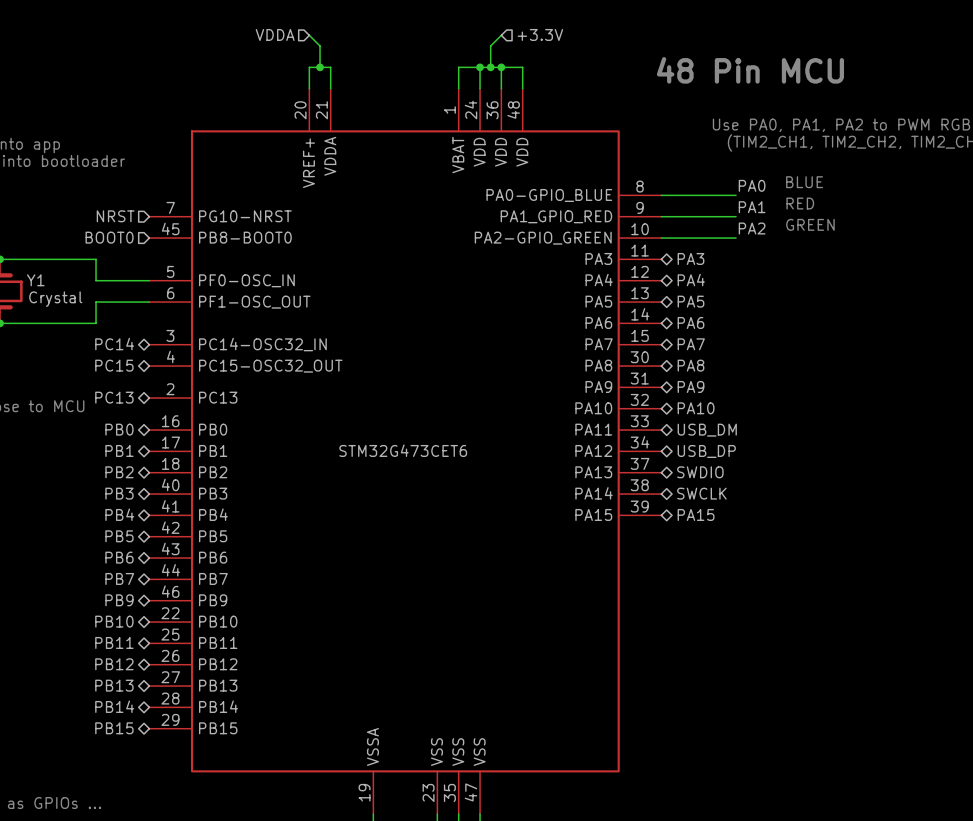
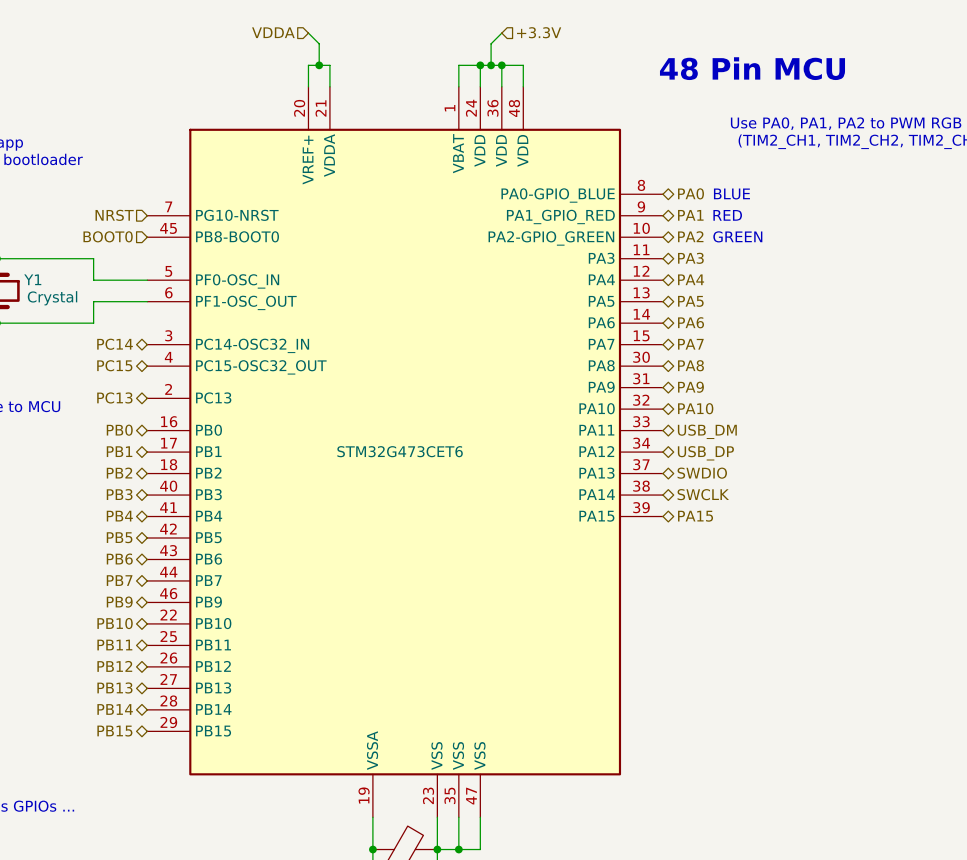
text position: BLUE (804, 182) -> BLUE (731, 193)
label: PA0 (752, 185) -> none
hierarchical label: none -> PA0 (691, 193)
wire: (661, 195) (736, 195) -> none
text position: RED (800, 203) -> RED (727, 215)
label: PA1 (752, 207) -> none
wire: (661, 216) (736, 216) -> none
hierarchical label: none -> PA1 (690, 215)
text position: GREEN (810, 224) -> GREEN (737, 236)
label: PA2 (752, 228) -> none
hierarchical label: none -> PA2 (690, 236)
wire: (661, 238) (736, 238) -> none

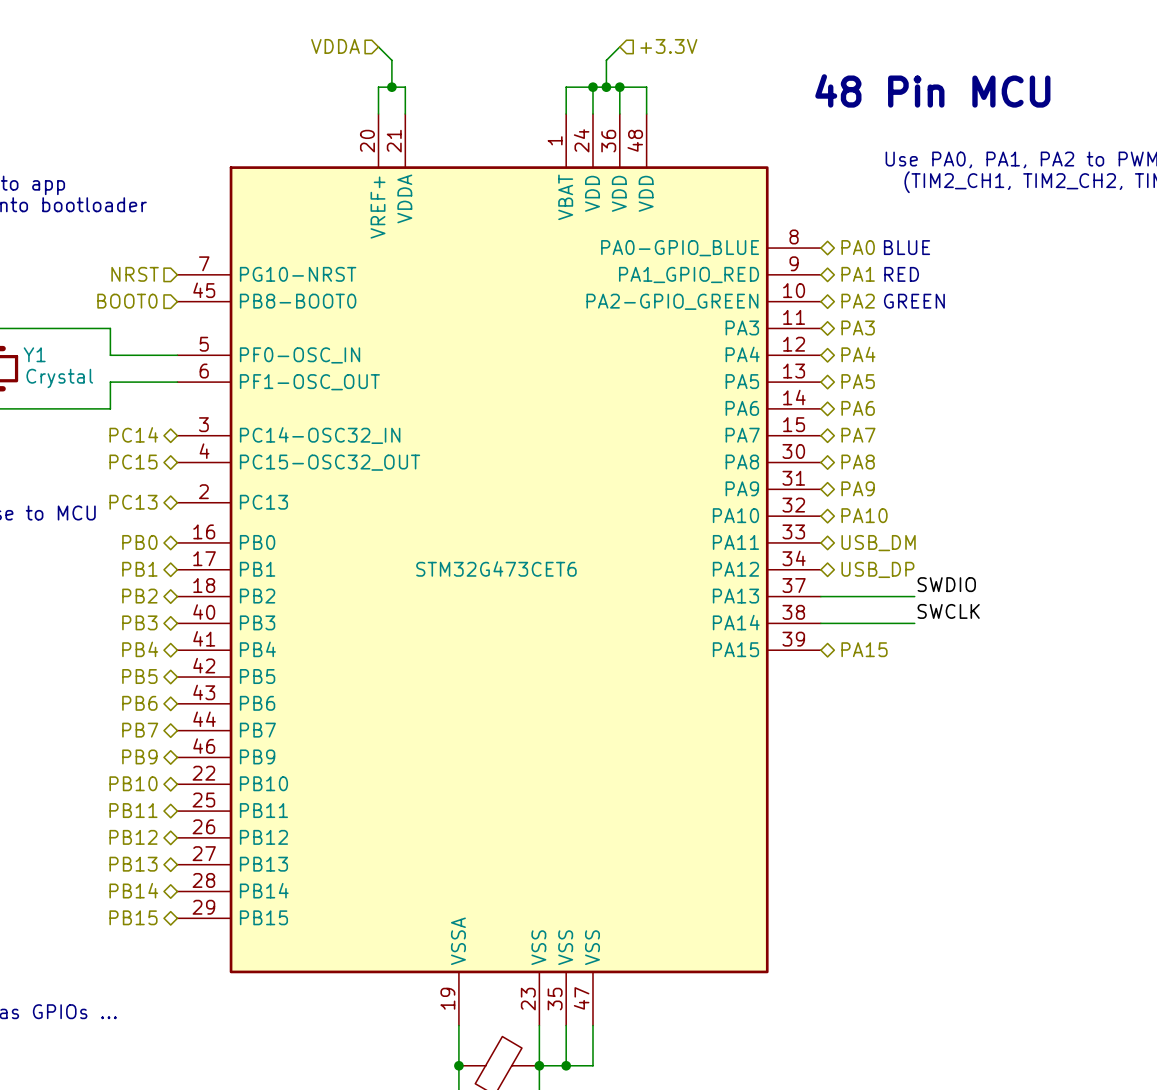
label: none -> SWDIO (946, 584)
wire: none -> (820, 596) (914, 596)
hierarchical label: SWDIO (702, 473) -> none
label: none -> SWCLK (948, 611)
hierarchical label: SWCLK (703, 494) -> none
wire: none -> (820, 623) (914, 623)

